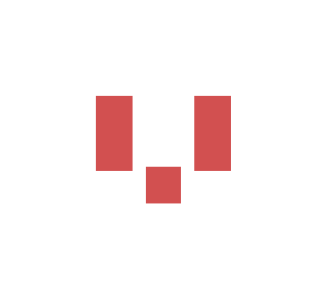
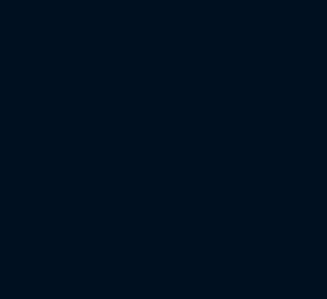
part: (163, 149) -> none

